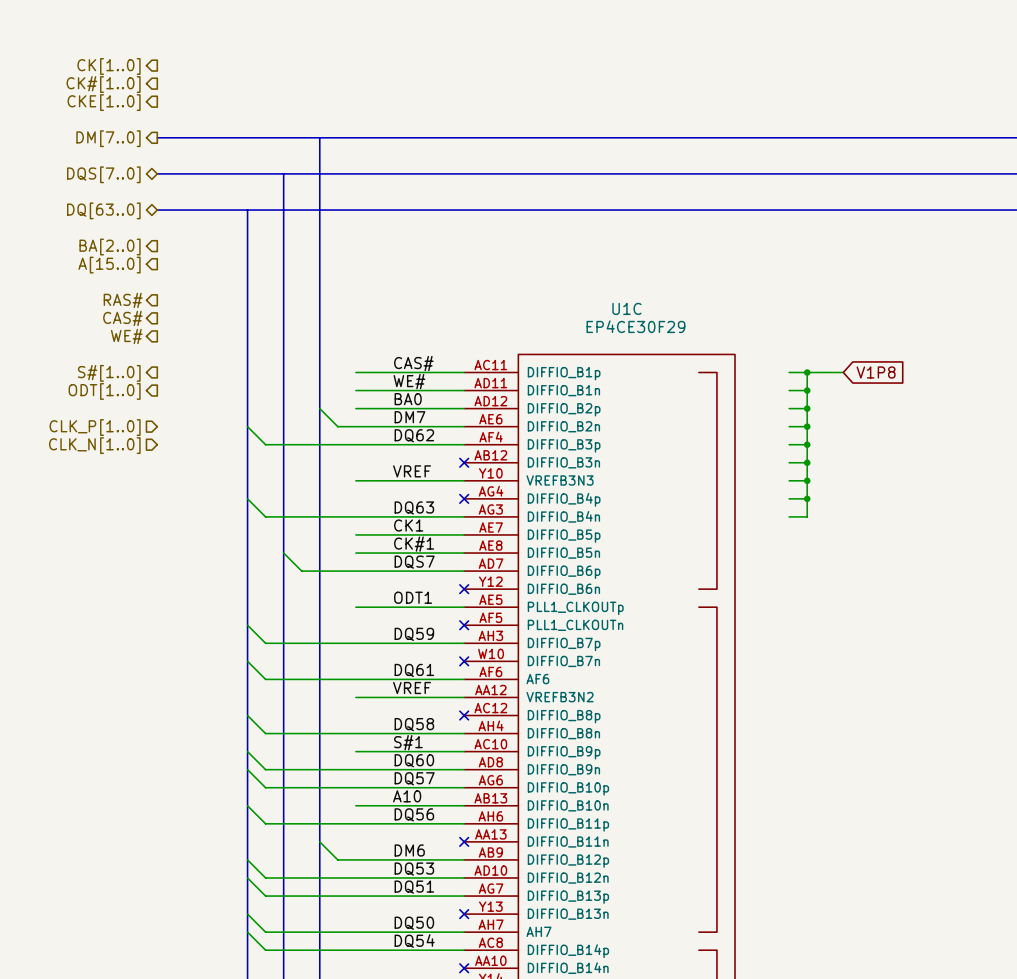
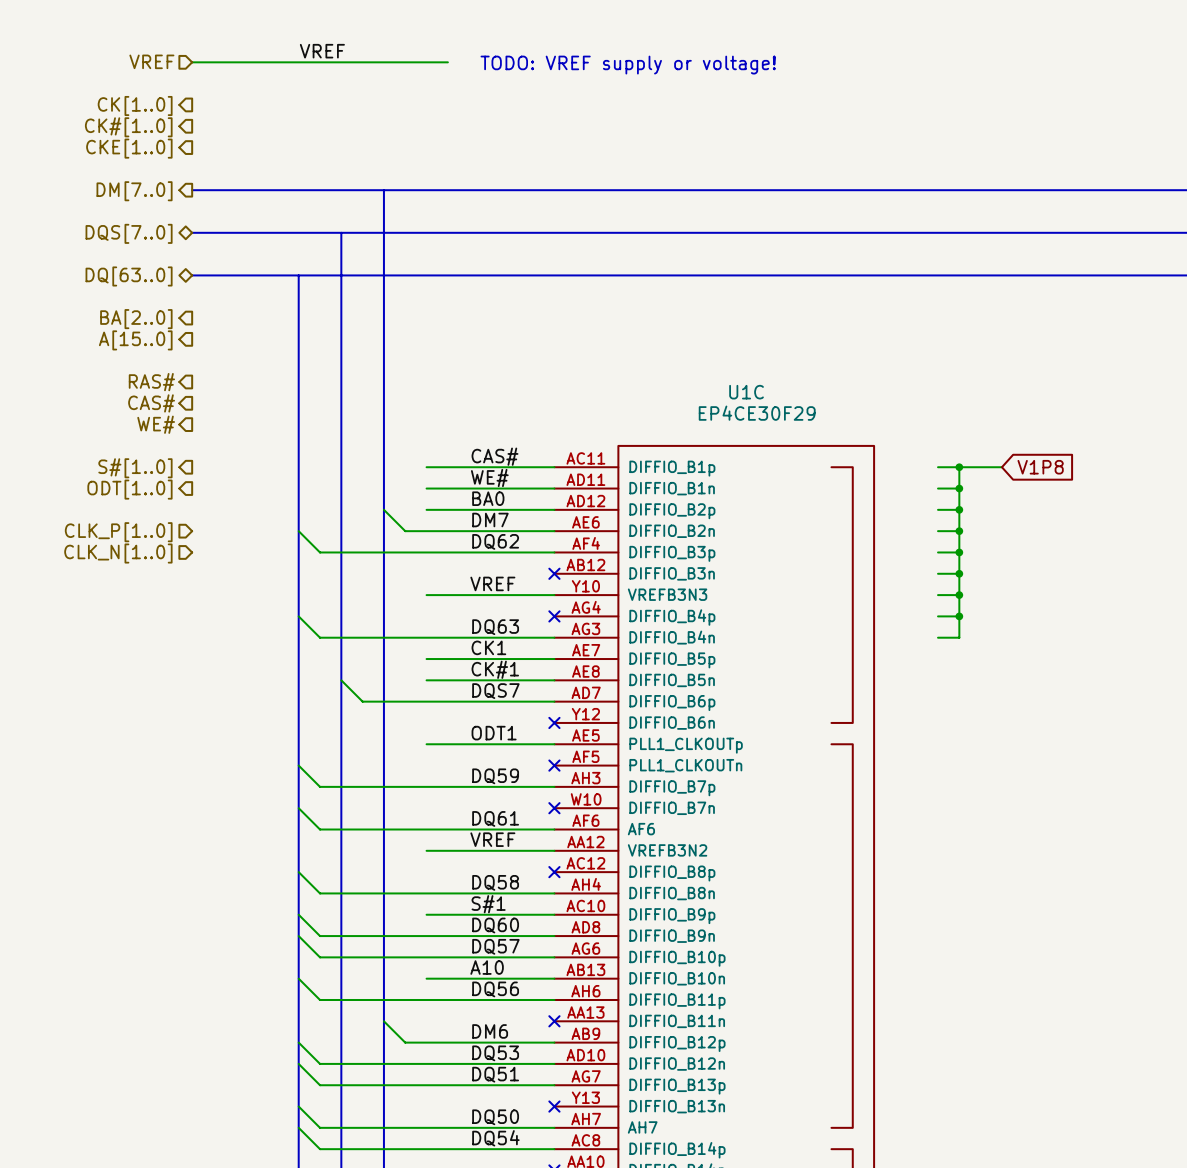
label: none -> VREF (322, 51)
hierarchical label: none -> VREF (151, 61)
wire: none -> (192, 62) (447, 62)
text: none -> TODO: VREF supply or voltage! (628, 65)

